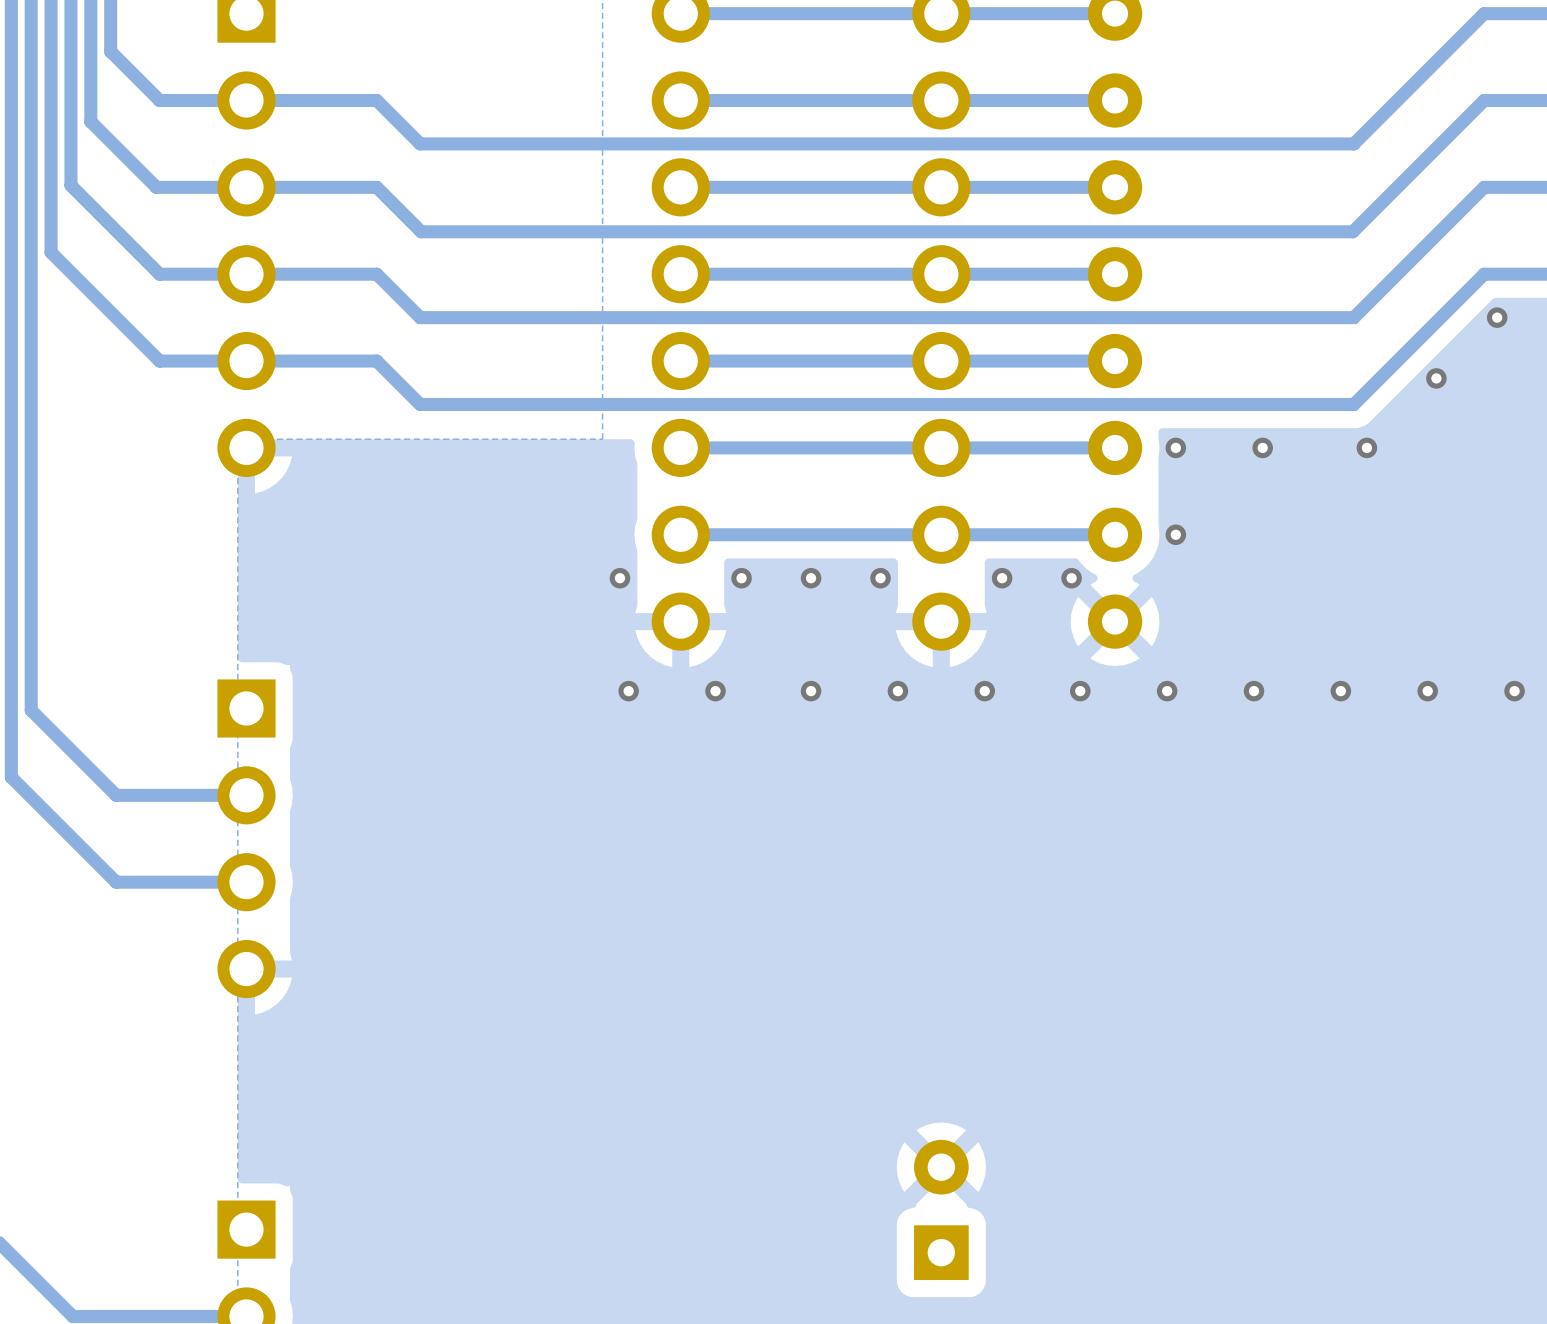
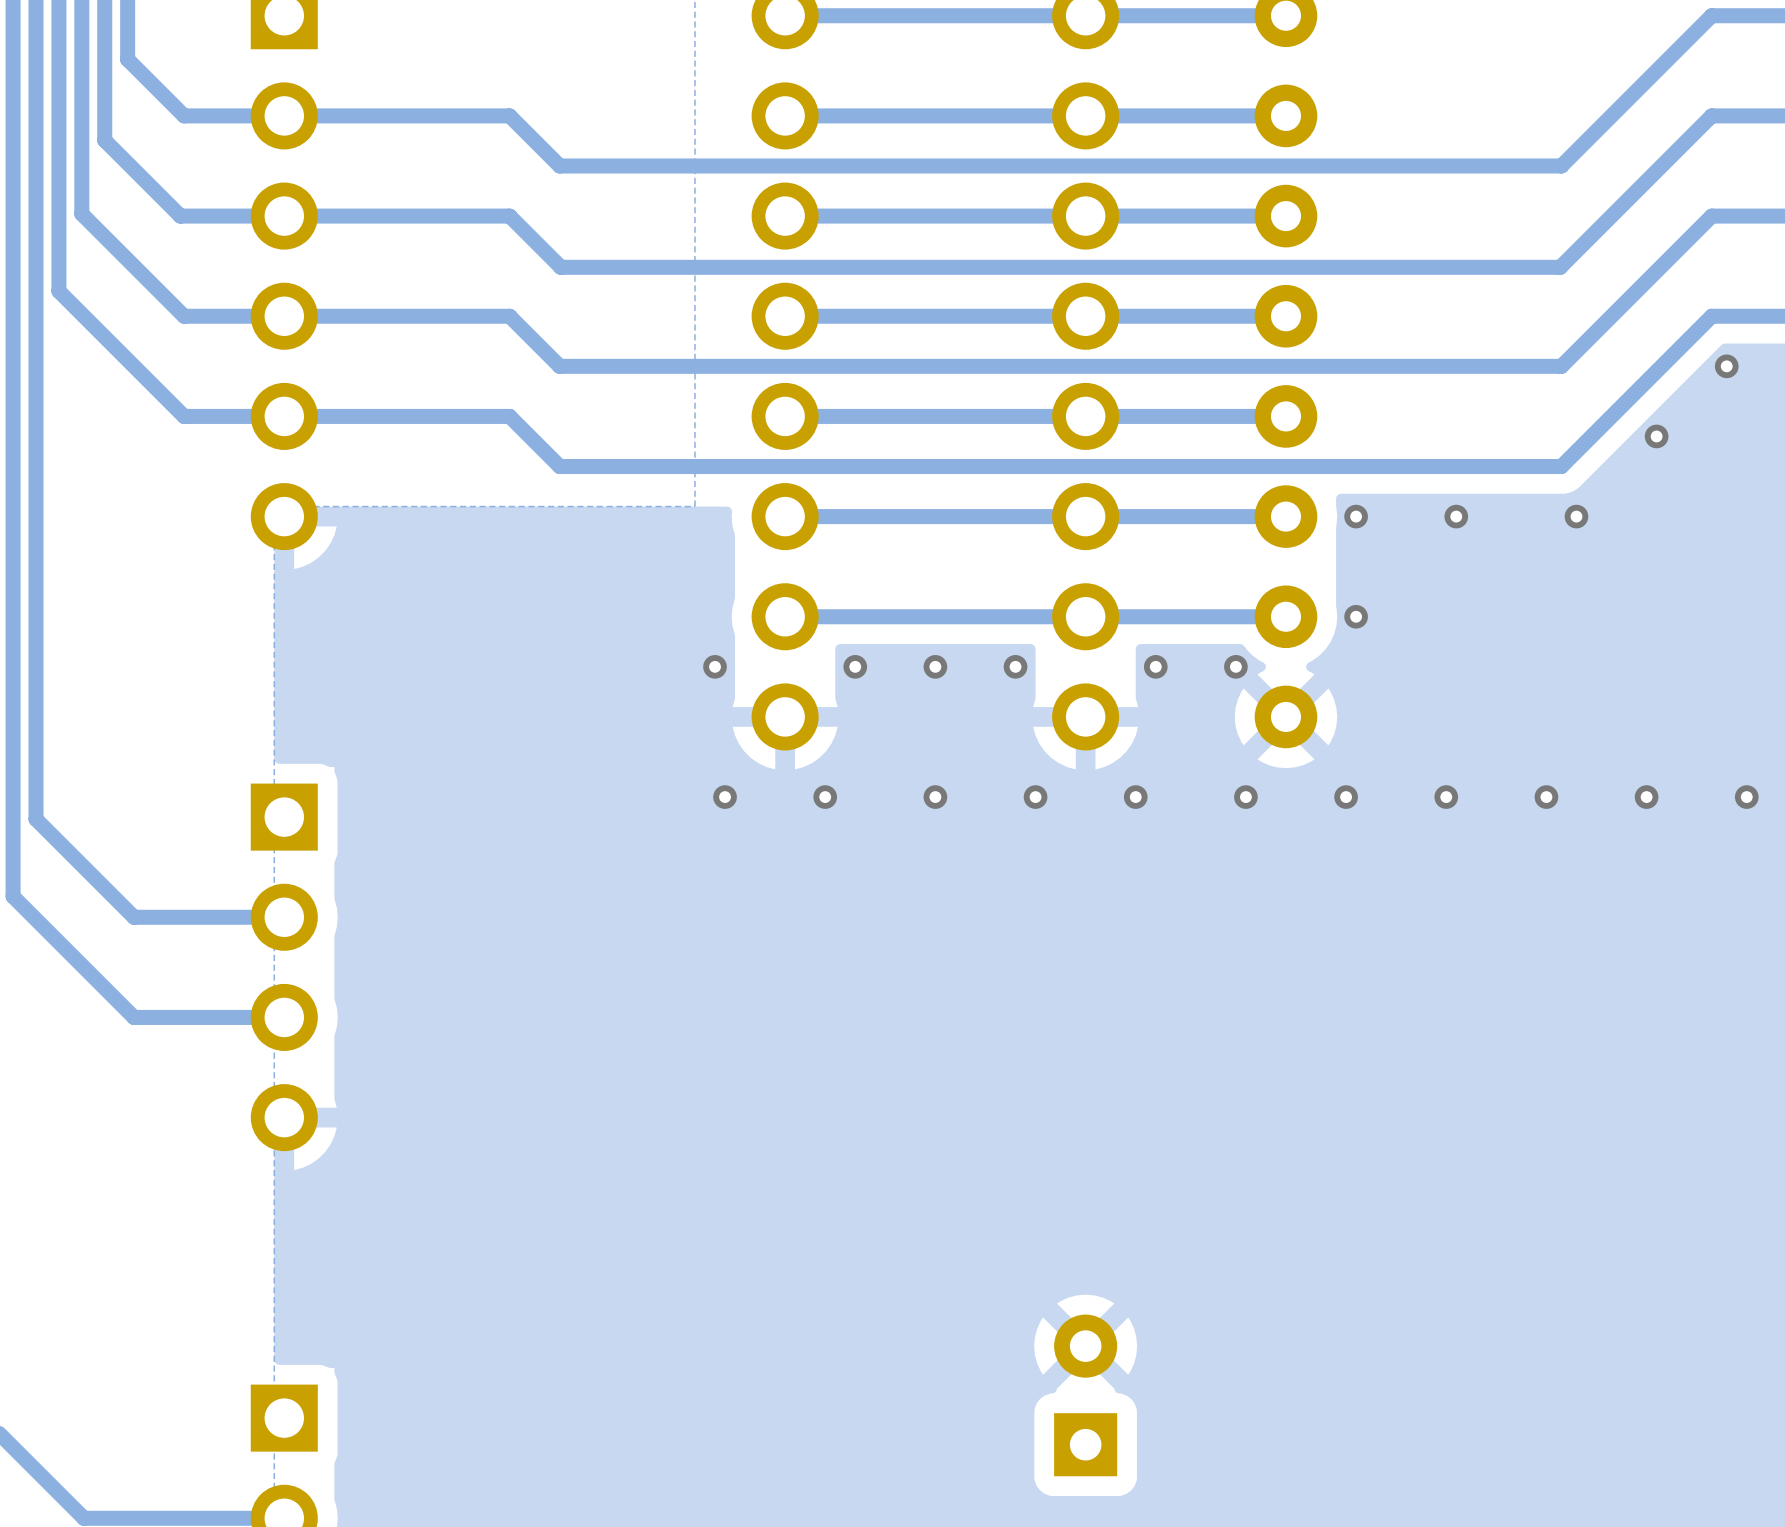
track: (376, 100) (420, 143) (485, 143) -> (434, 115) (509, 115) (559, 166)
track: (376, 187) (421, 231) (486, 231) -> (434, 216) (509, 216) (560, 267)
track: (376, 274) (420, 317) (485, 317) -> (434, 316) (509, 316) (559, 366)
track: (376, 361) (420, 404) (485, 404) -> (434, 416) (509, 416) (559, 466)

